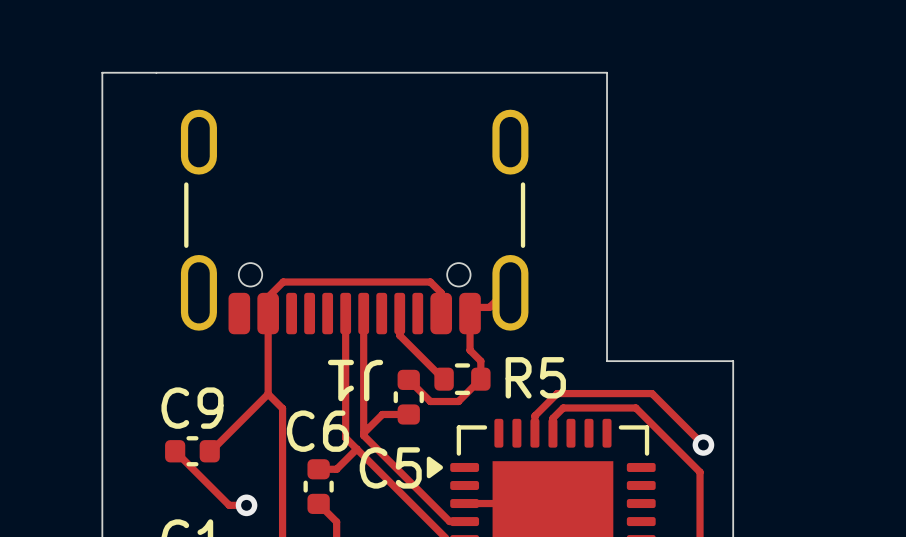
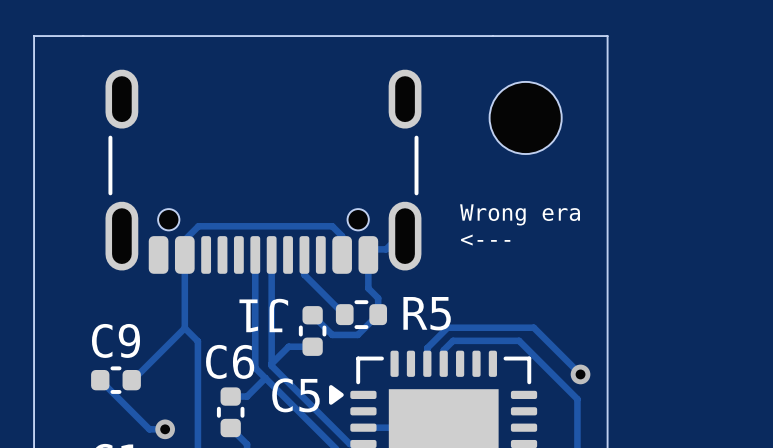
board edge: (607, 72) (607, 361) (733, 361) -> (492, 36) (607, 36) (607, 298)
part: none -> (525, 117)
text: none -> Wrong era (520, 214)
text: none -> <--- (485, 240)

